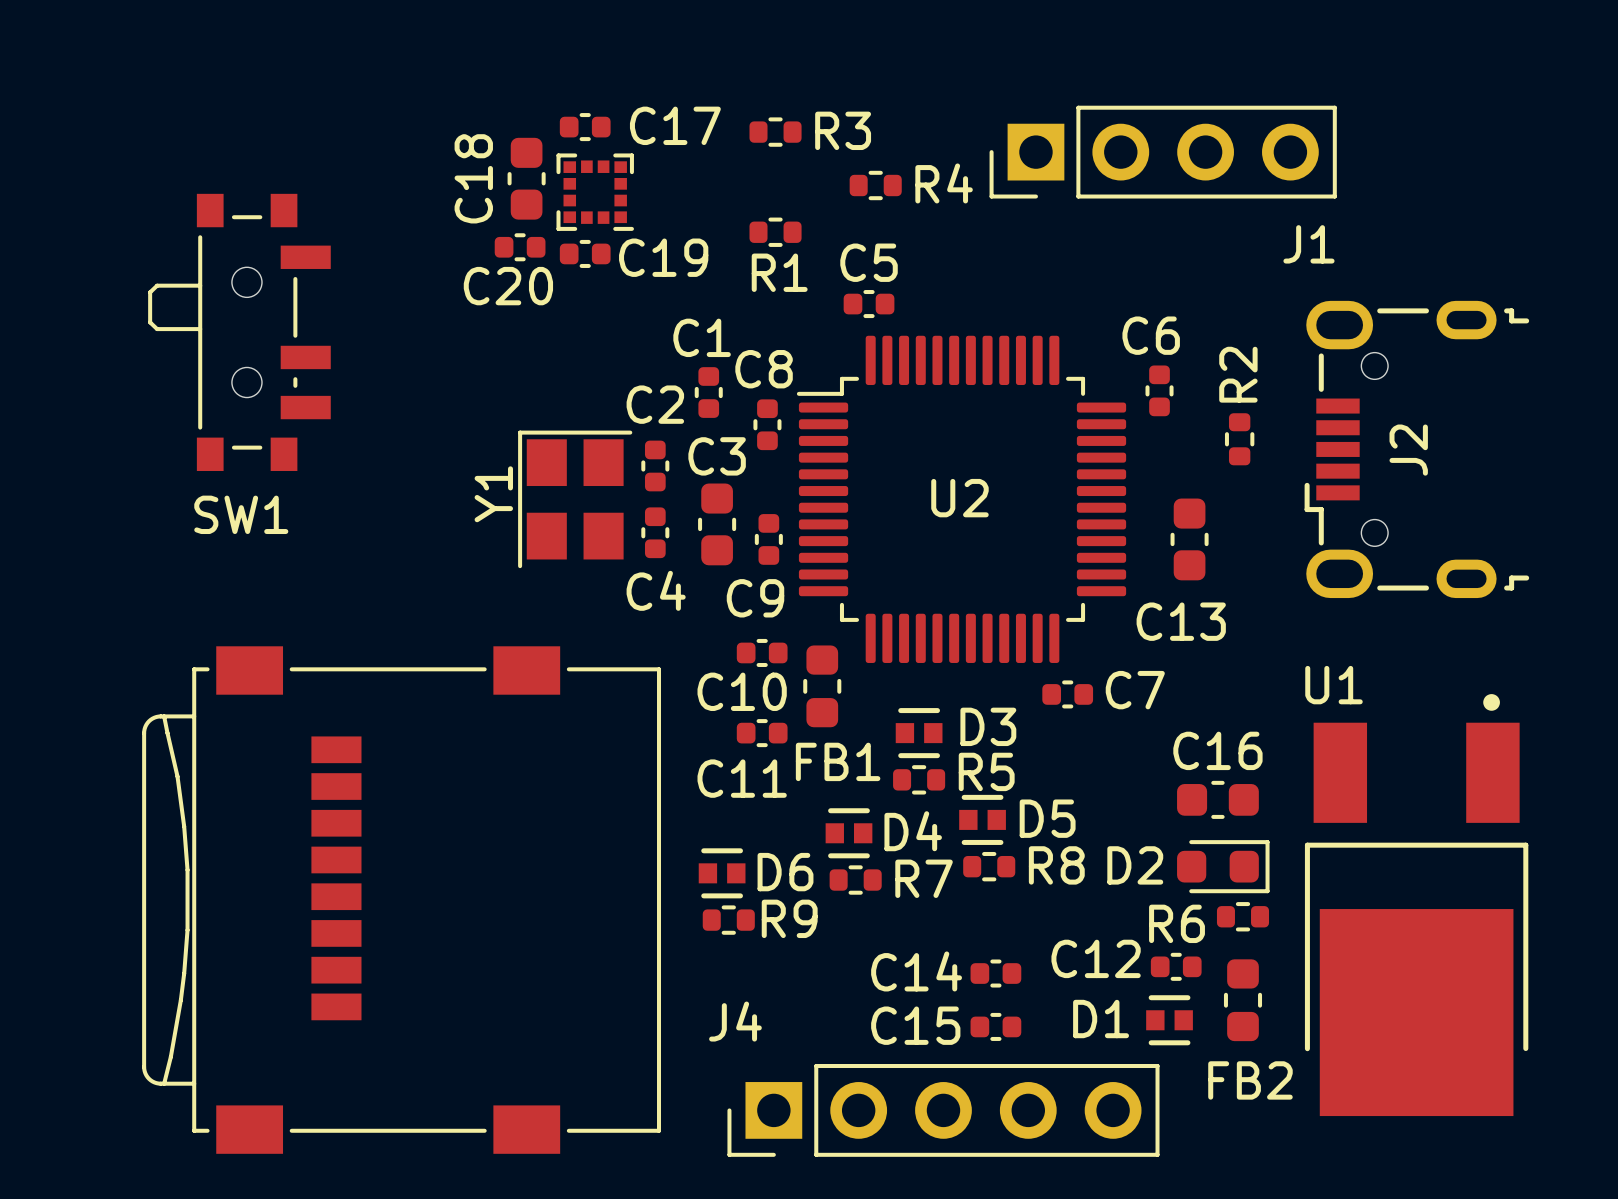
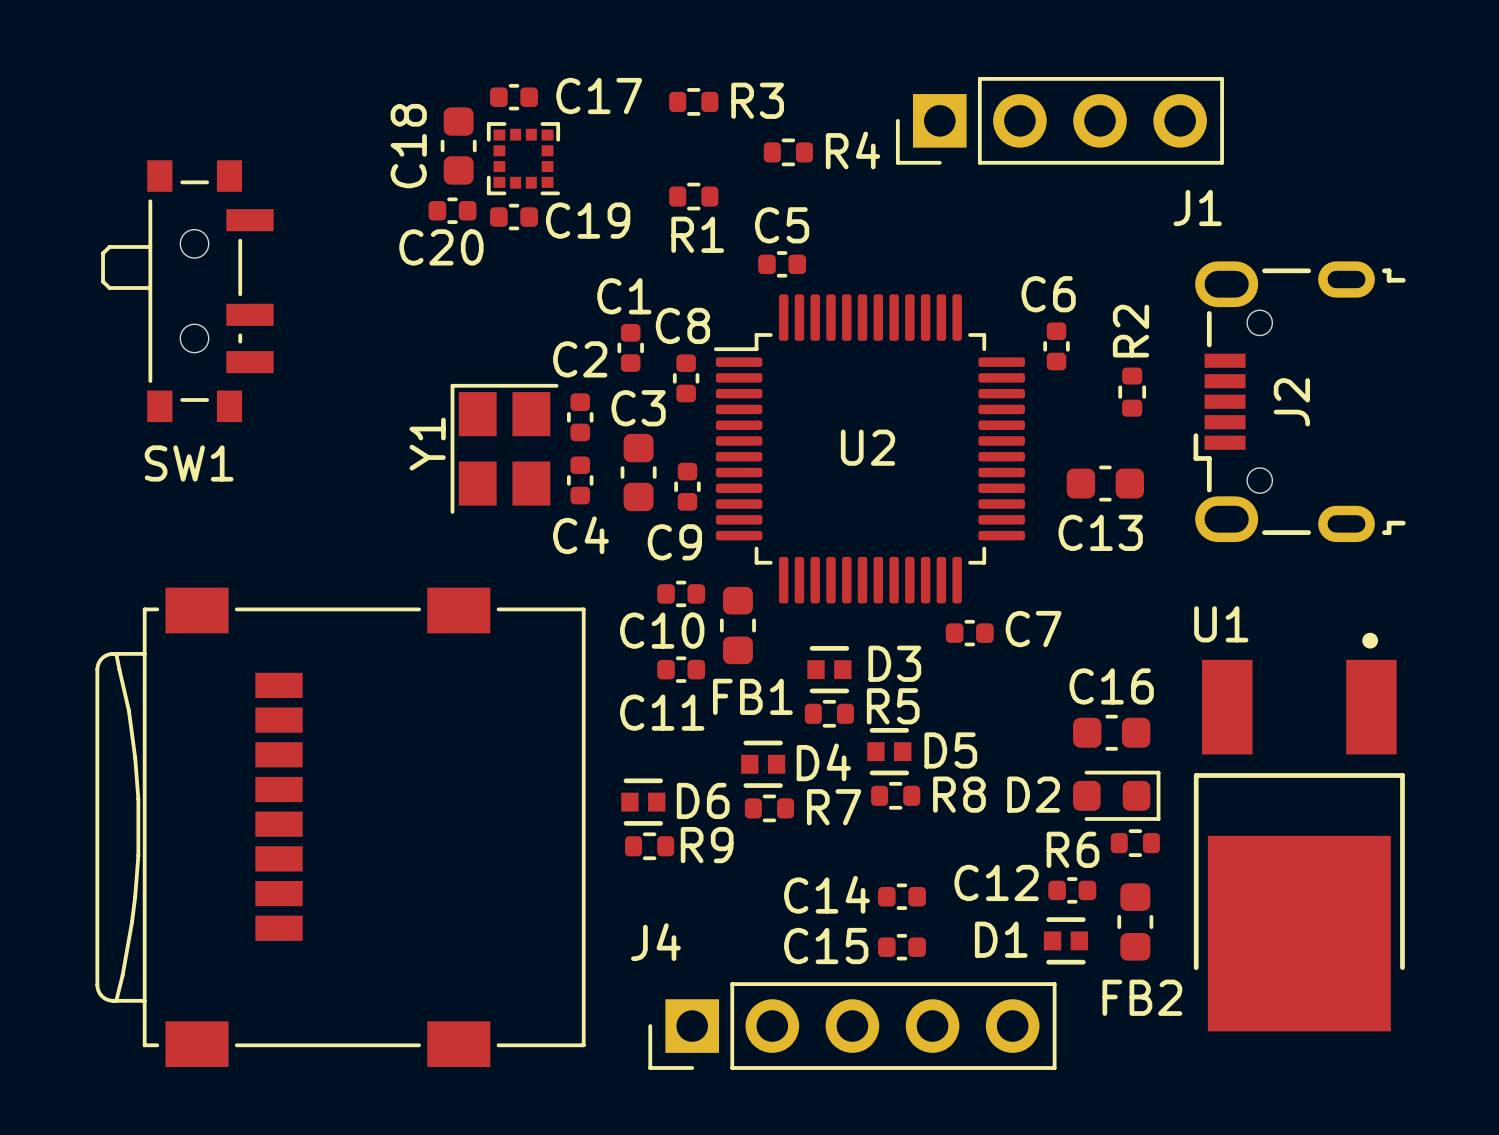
C13 rotation: 0° (1189, 539) -> 90° clockwise (1105, 483)

